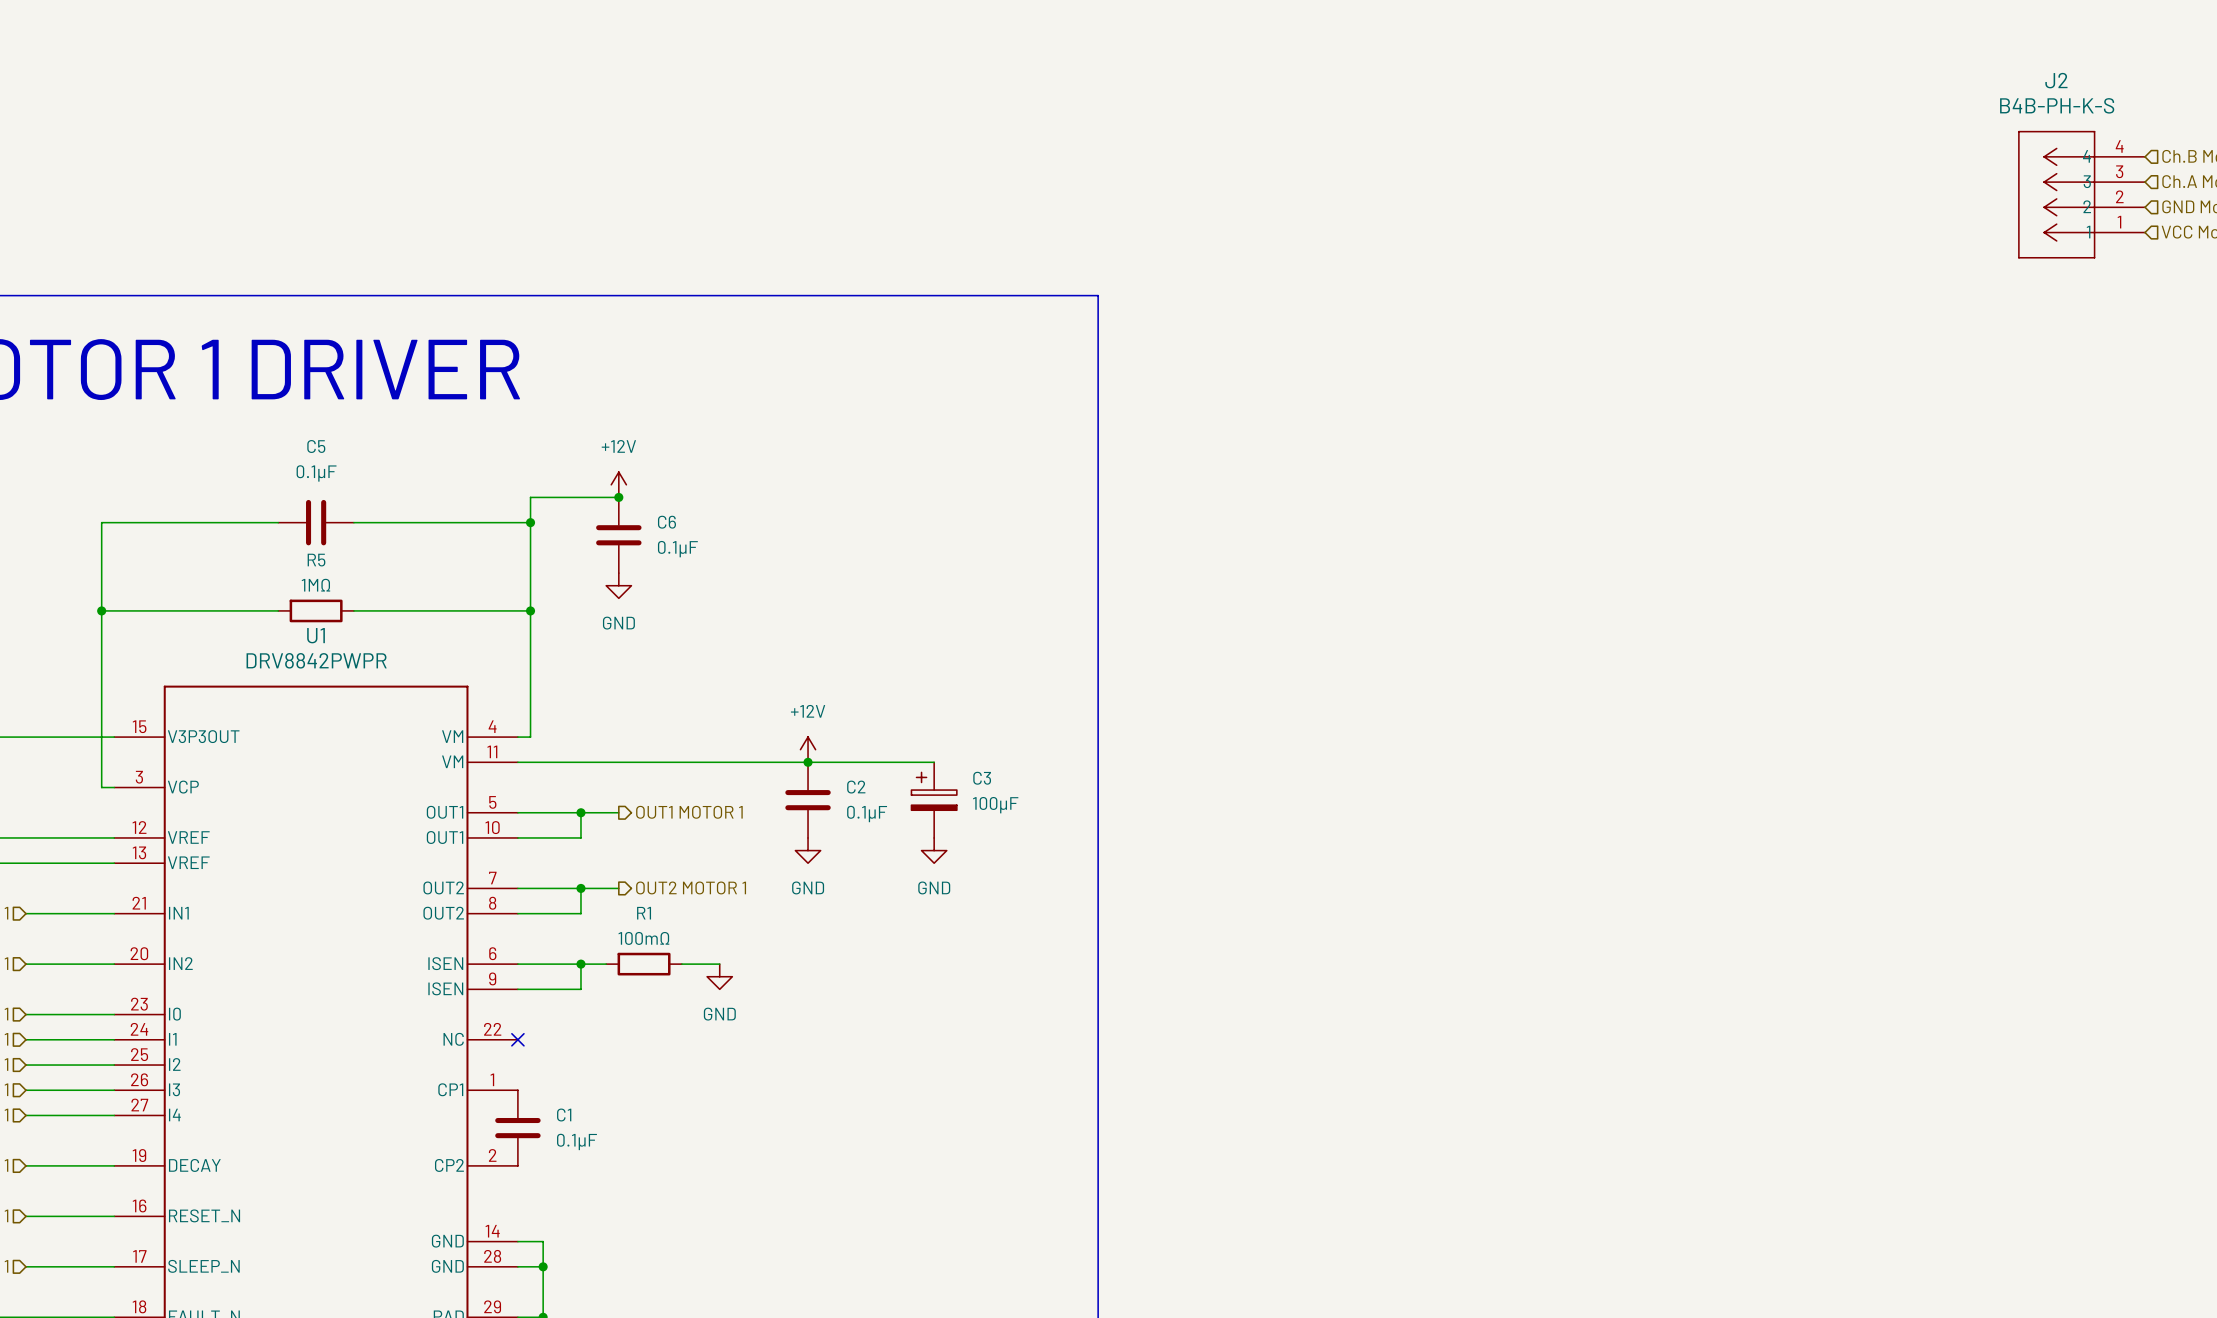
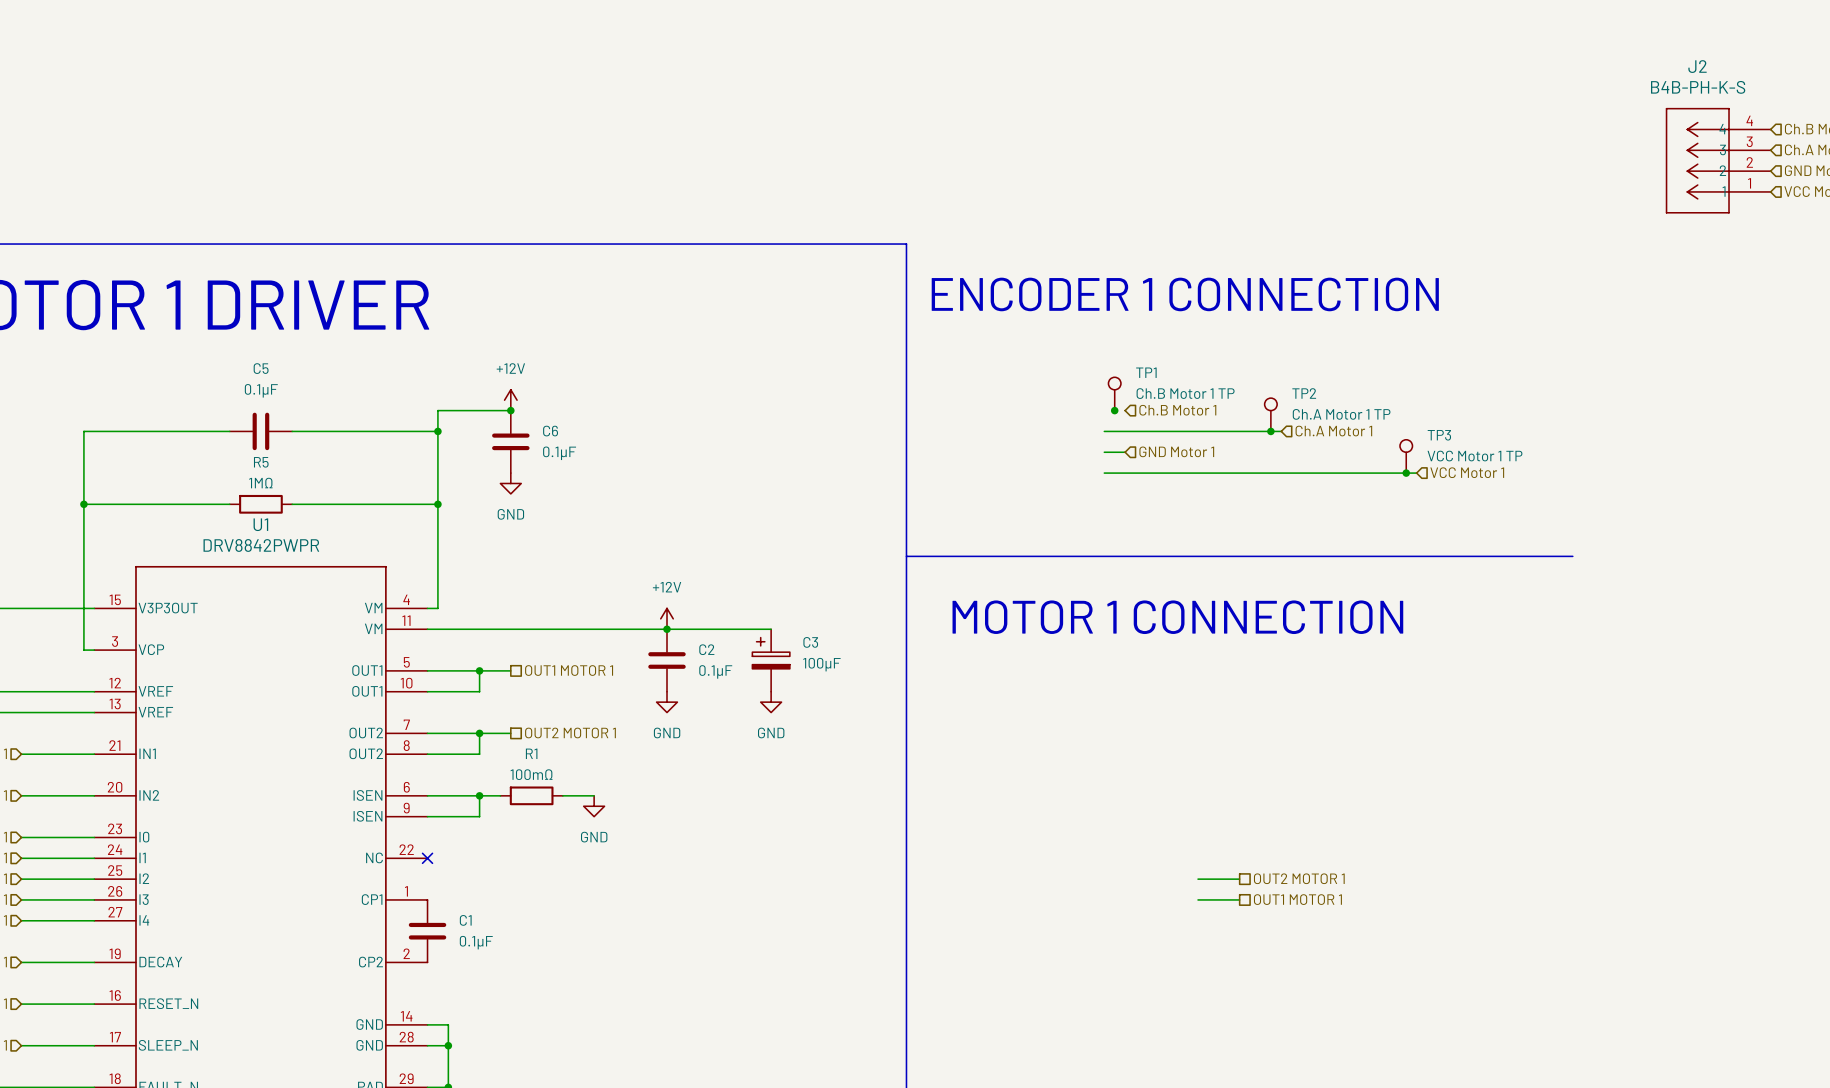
text: none -> ENCODER 1 CONNECTION (1185, 294)
TP1: none -> Ch.B Motor 1 TP (1114, 393)
hierarchical label: none -> Ch.B Motor 1 (1177, 410)
junction: none -> (1114, 410)
TP2: none -> Ch.A Motor 1 TP (1270, 414)
wire: none -> (1104, 431) (1281, 431)
junction: none -> (1270, 431)
hierarchical label: none -> Ch.A Motor 1 (1333, 431)
wire: none -> (1104, 452) (1125, 452)
hierarchical label: none -> GND Motor 1 (1176, 451)
TP3: none -> VCC Motor 1 TP (1406, 456)
hierarchical label: none -> VCC Motor 1 (1467, 472)
wire: none -> (1104, 473) (1416, 473)
junction: none -> (1406, 473)
line: none -> (906, 556) (1572, 556)
text: none -> MOTOR 1 CONNECTION (1177, 617)
hierarchical label shape: output (689, 812) -> passive (569, 670)
hierarchical label shape: output (691, 887) -> passive (570, 732)
hierarchical label: none -> OUT2 MOTOR 1 (1299, 878)
wire: none -> (1198, 879) (1239, 879)
hierarchical label: none -> OUT1 MOTOR 1 (1297, 899)
wire: none -> (1198, 899) (1239, 899)

